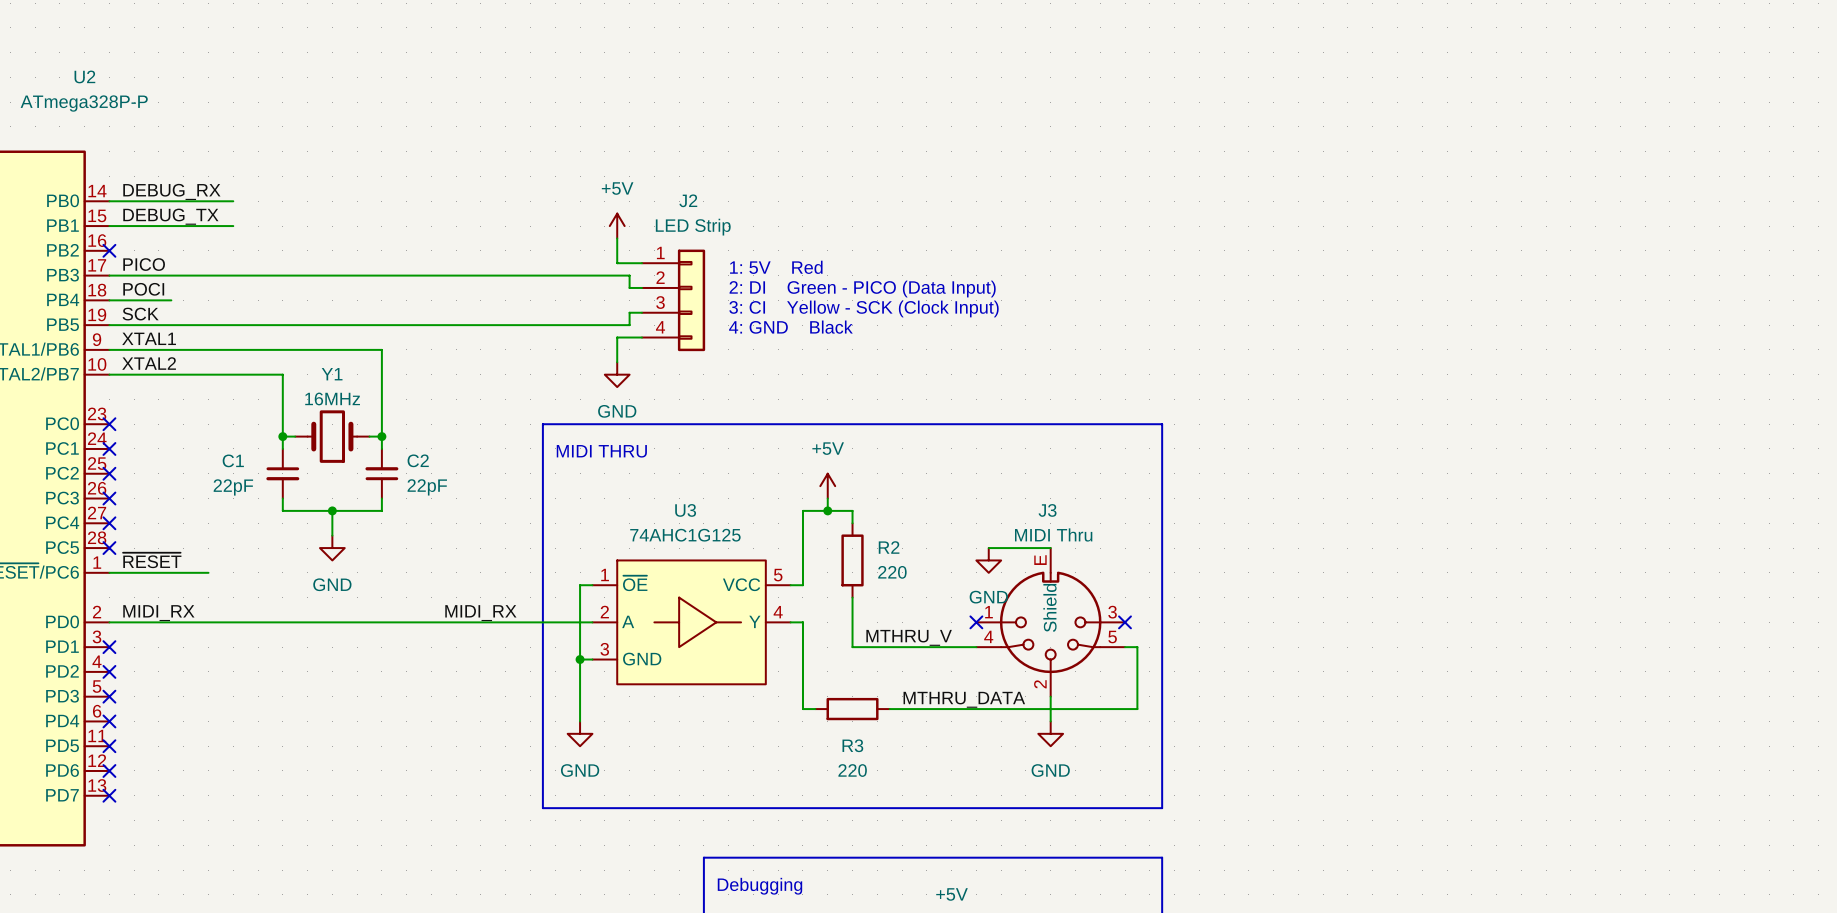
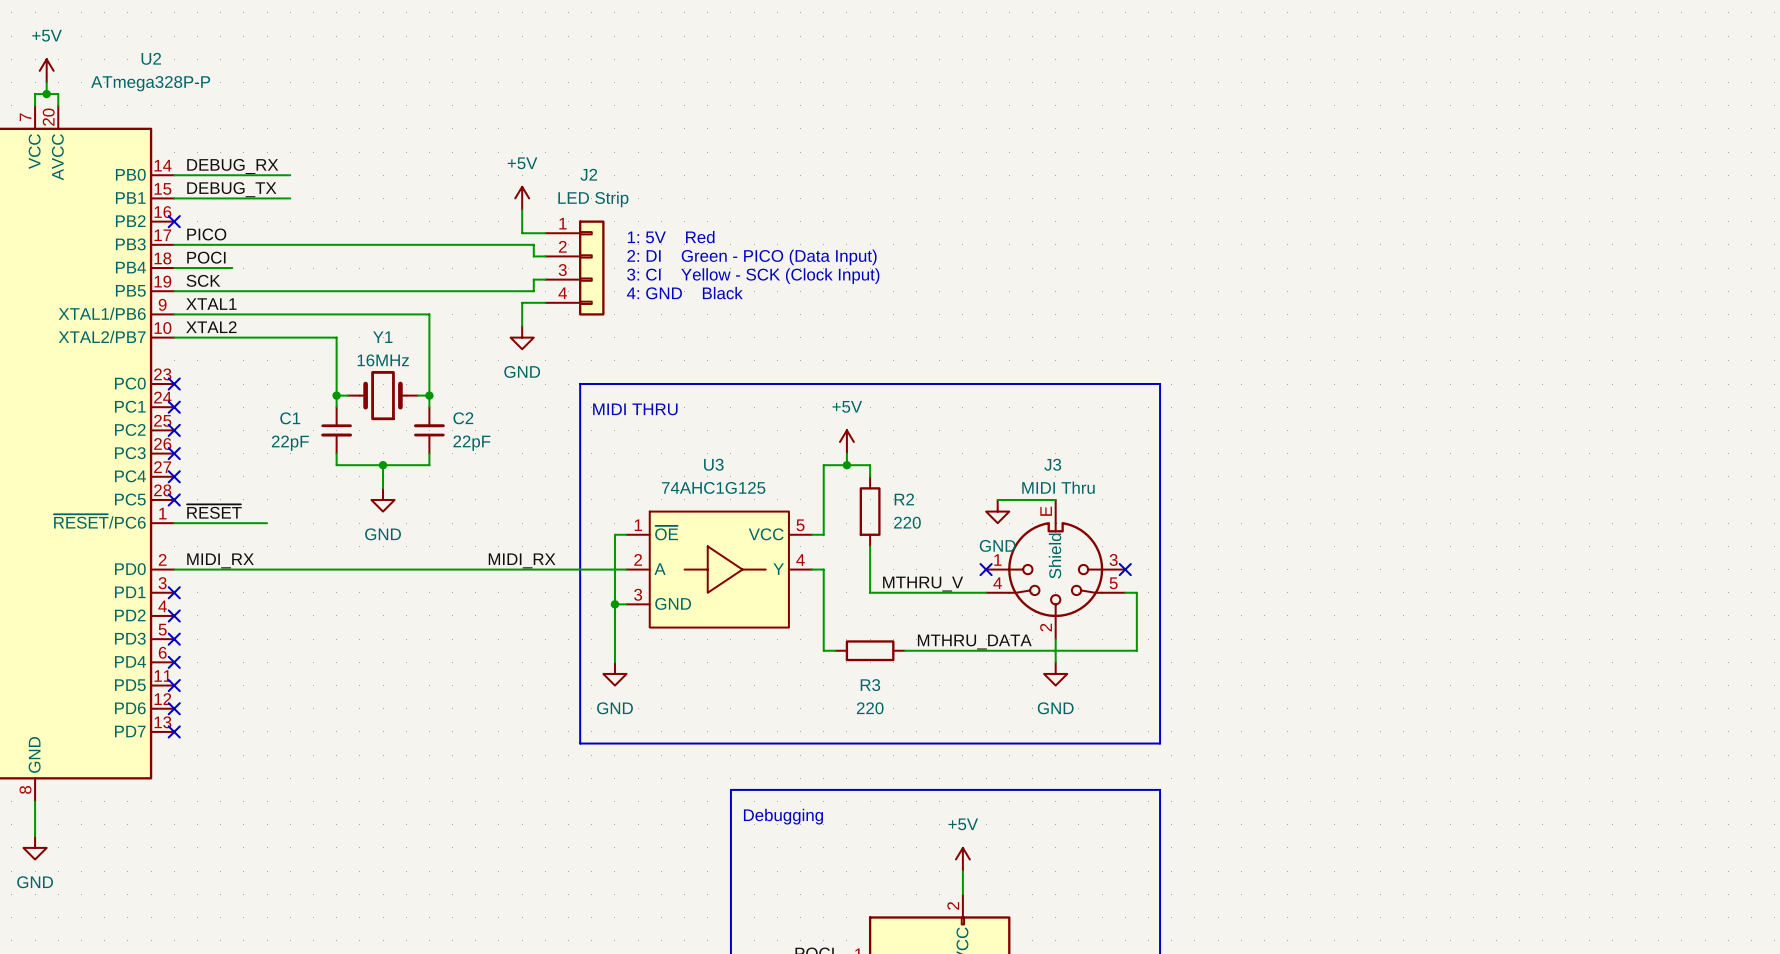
power symbol position: +5V (617, 226) -> +5V (522, 198)
wire: (617, 238) (617, 263) (641, 263) -> (522, 210) (522, 233) (545, 233)
text position: 1: 5V Red (776, 267) -> 1: 5V Red (671, 237)
wire: (493, 275) (629, 275) (629, 287) (641, 287) -> (533, 244) (533, 256) (545, 256)
text position: 2: DI Green - PICO (Data Input) (862, 289) -> 2: DI Green - PICO (Data Input) (752, 257)
J2 position: (673, 300) -> (574, 268)
text position: 3: CI Yellow - SCK (Clock Input) (864, 308) -> 3: CI Yellow - SCK (Clock Input) (753, 276)
wire: (641, 312) (629, 312) (629, 325) (493, 325) -> (545, 279) (533, 279) (533, 291)
text position: 4: GND Black (790, 327) -> 4: GND Black (684, 293)
wire: (641, 337) (617, 337) (617, 362) -> (545, 302) (522, 302) (522, 326)
power symbol position: GND (617, 374) -> GND (522, 337)

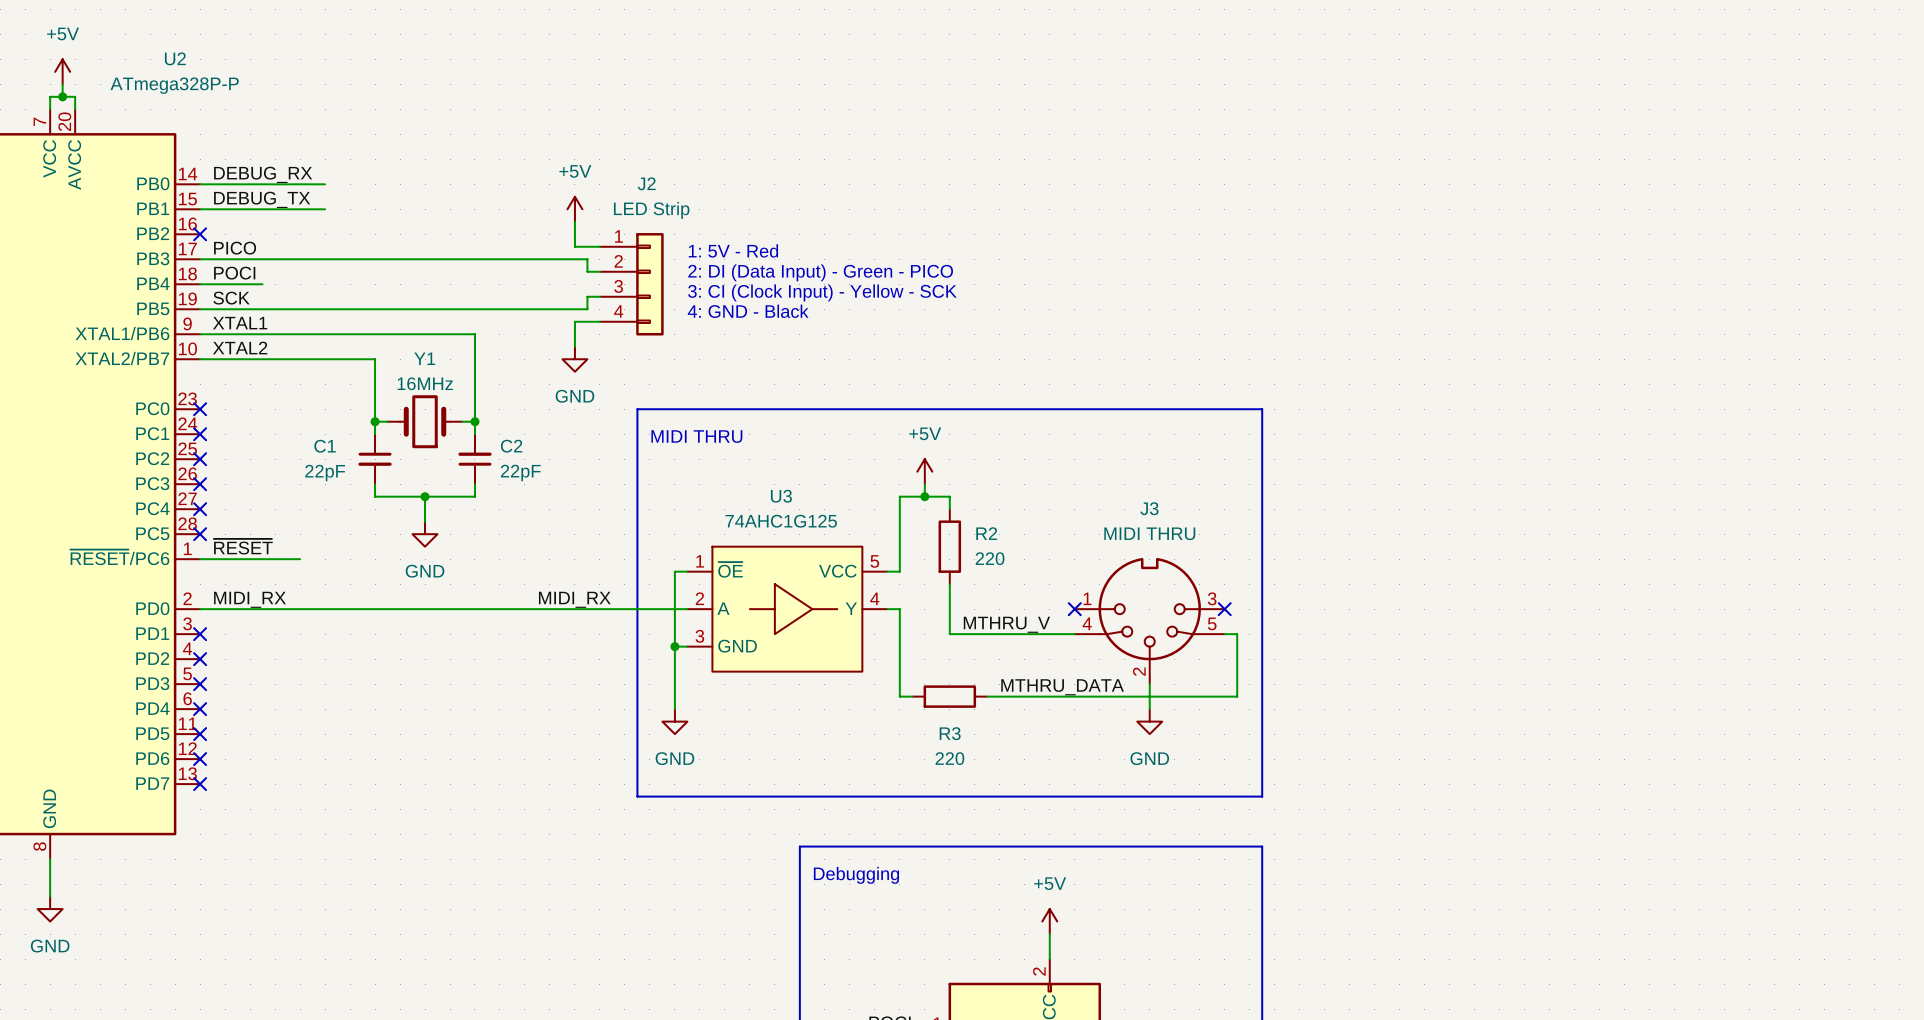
text: 1: 5V Red (671, 237) -> 1: 5V - Red (733, 250)
text: 2: DI Green - PICO (Data Input) (752, 257) -> 2: DI (Data Input) - Green - PICO (820, 272)
text: 3: CI Yellow - SCK (Clock Input) (753, 276) -> 3: CI (Clock Input) - Yellow - SCK (822, 292)
text: 4: GND Black (684, 293) -> 4: GND - Black (748, 311)
J3 value: MIDI Thru (1058, 487) -> MIDI THRU (1149, 533)
J3 symbol: [986, 499, 1126, 640] -> [1074, 557, 1225, 685]
wire: (997, 499) (1055, 499) -> none
power symbol: GND (997, 511) -> none

